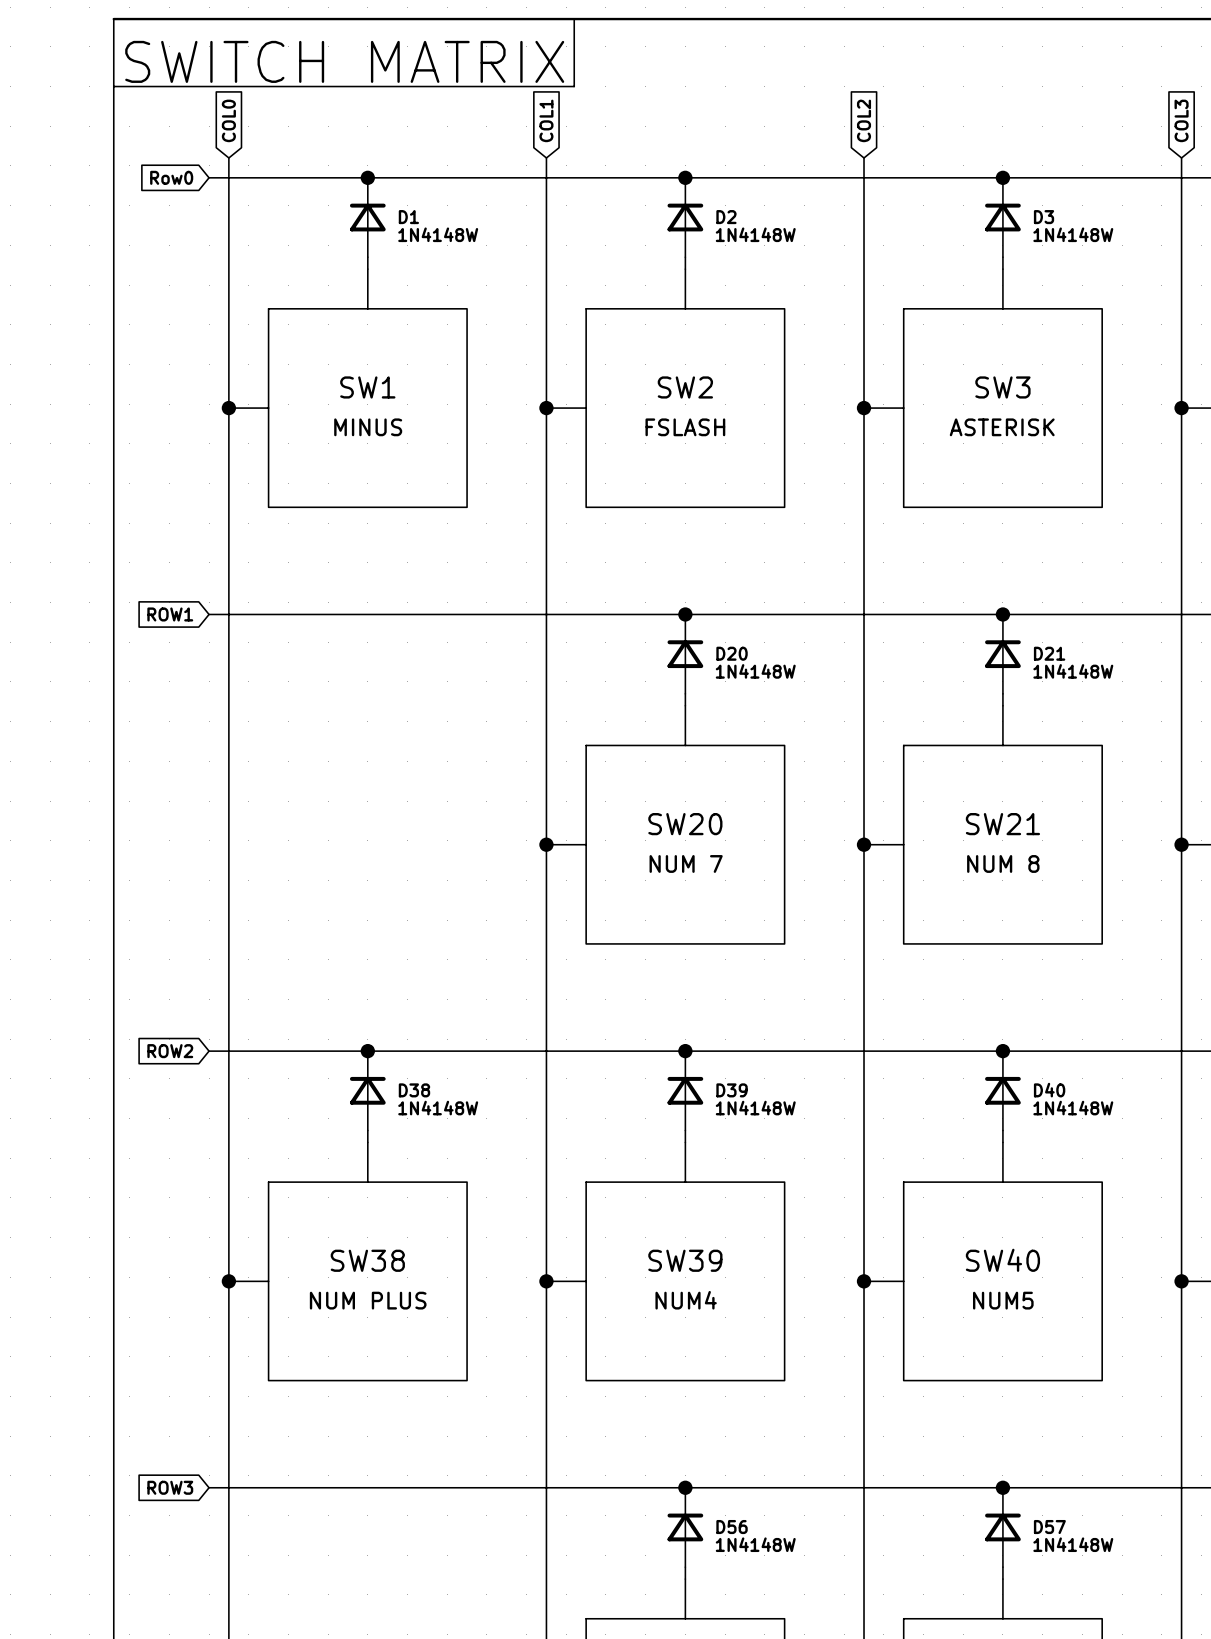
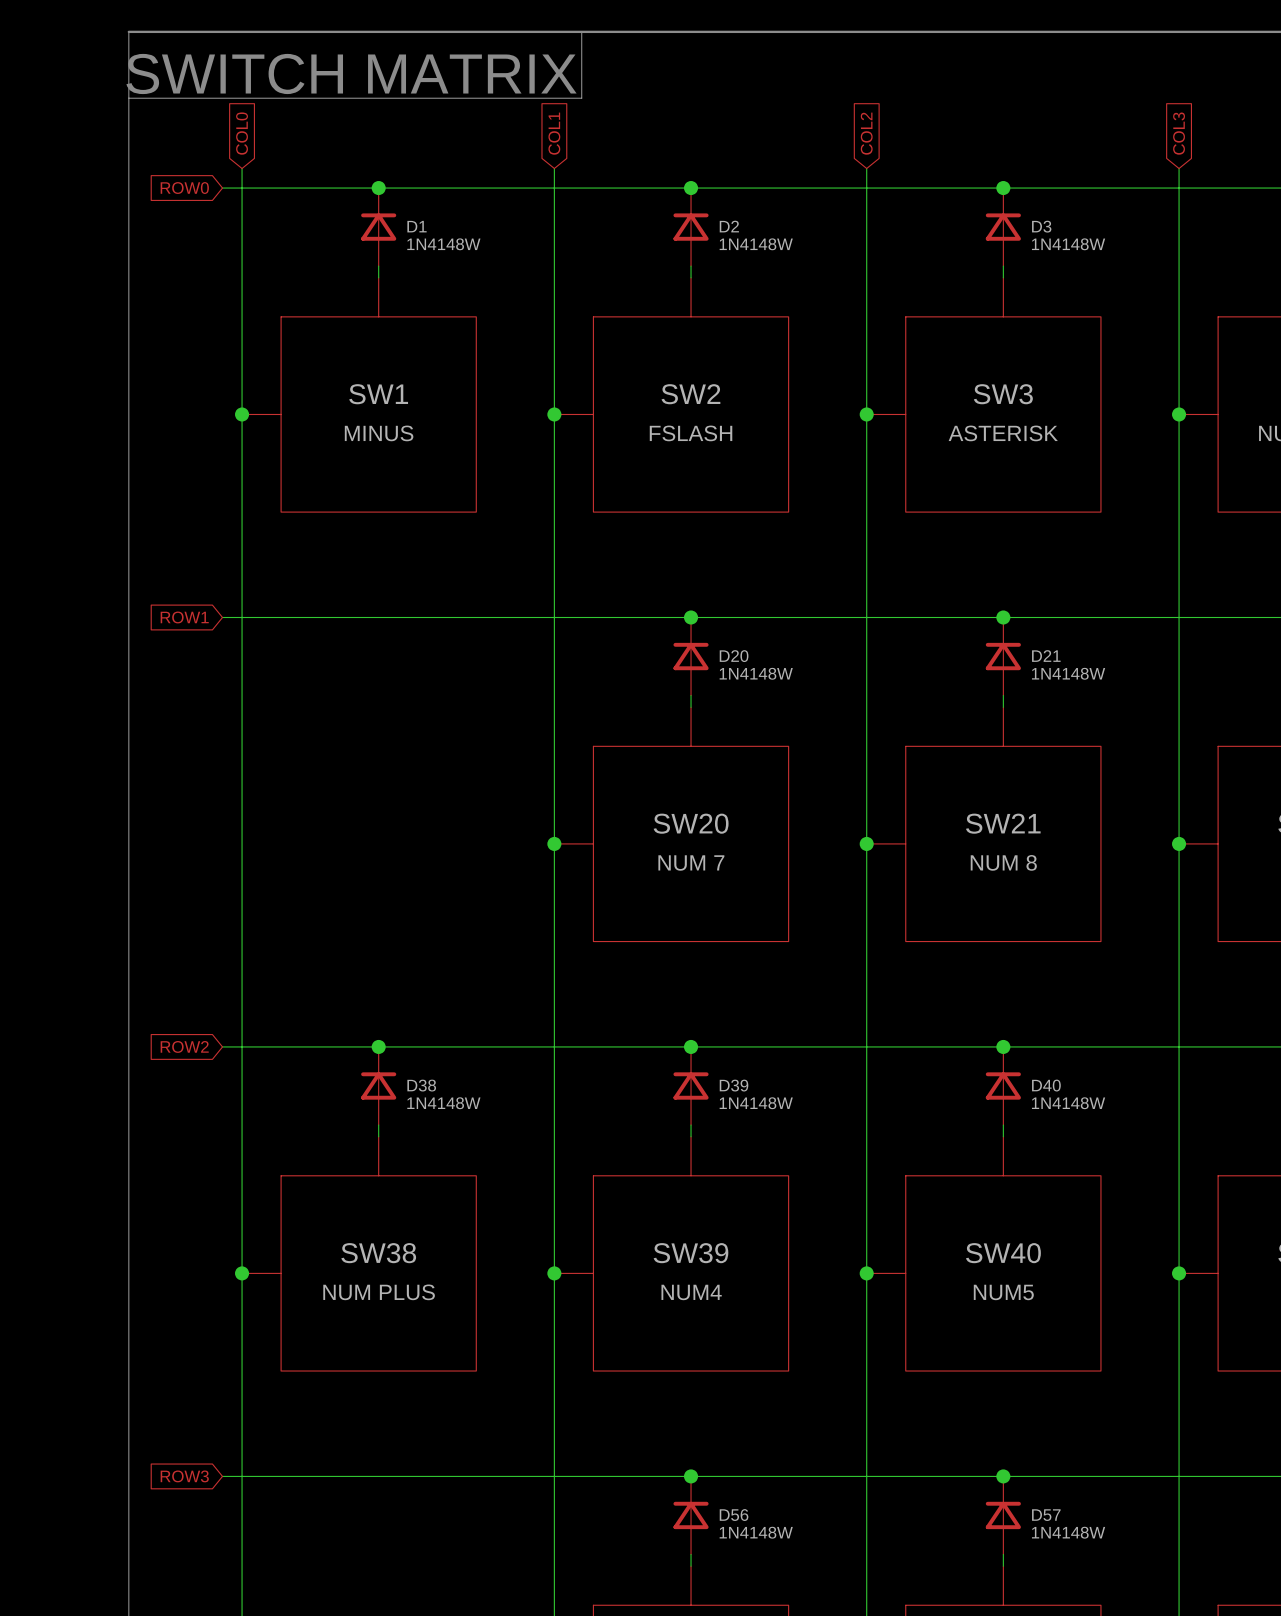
global label: Row0 (171, 177) -> ROW0 (184, 188)

